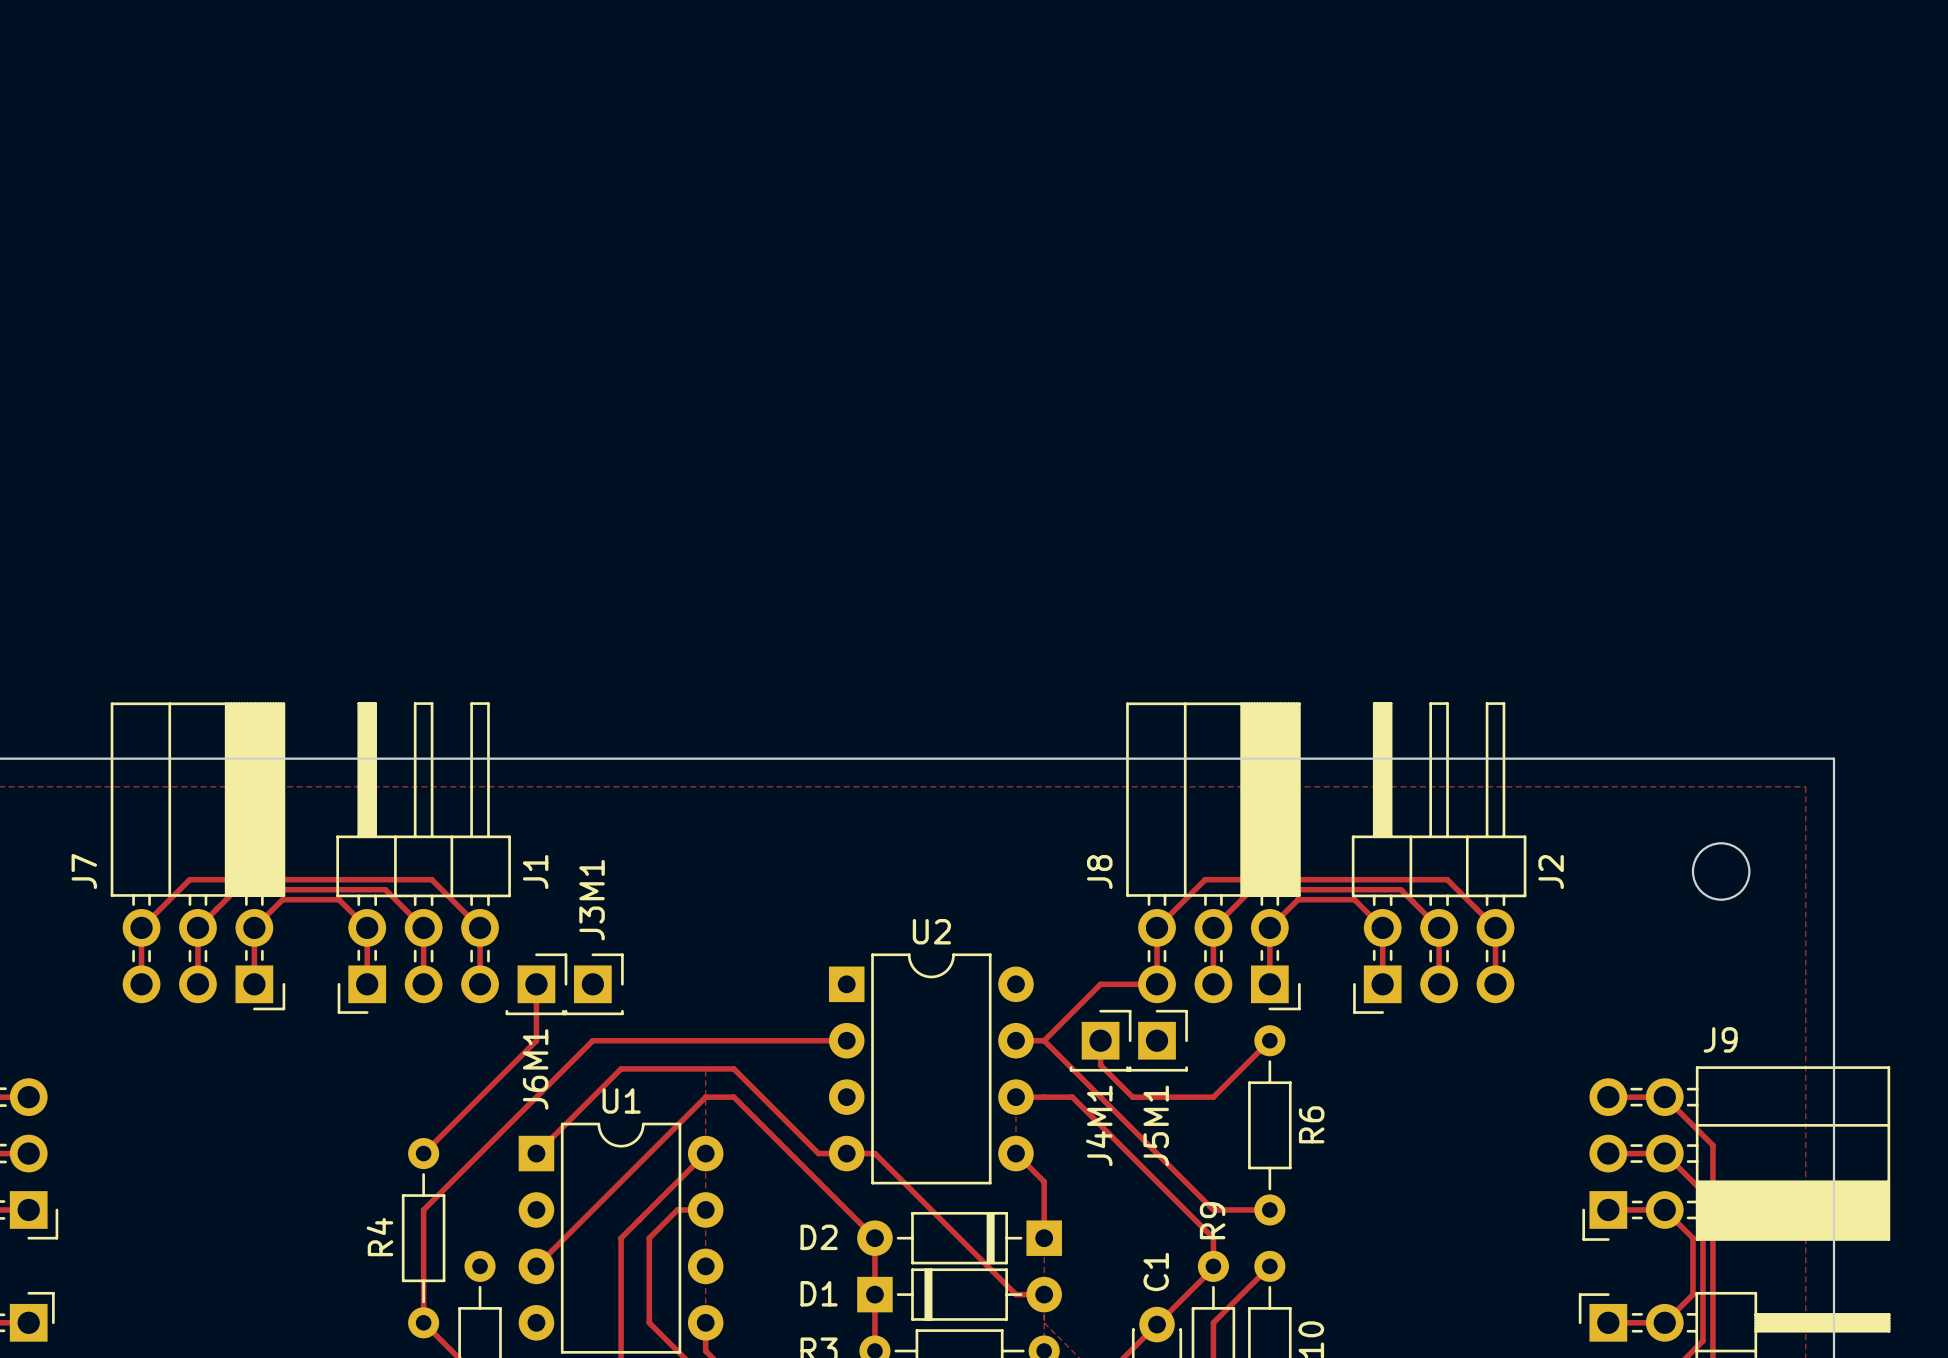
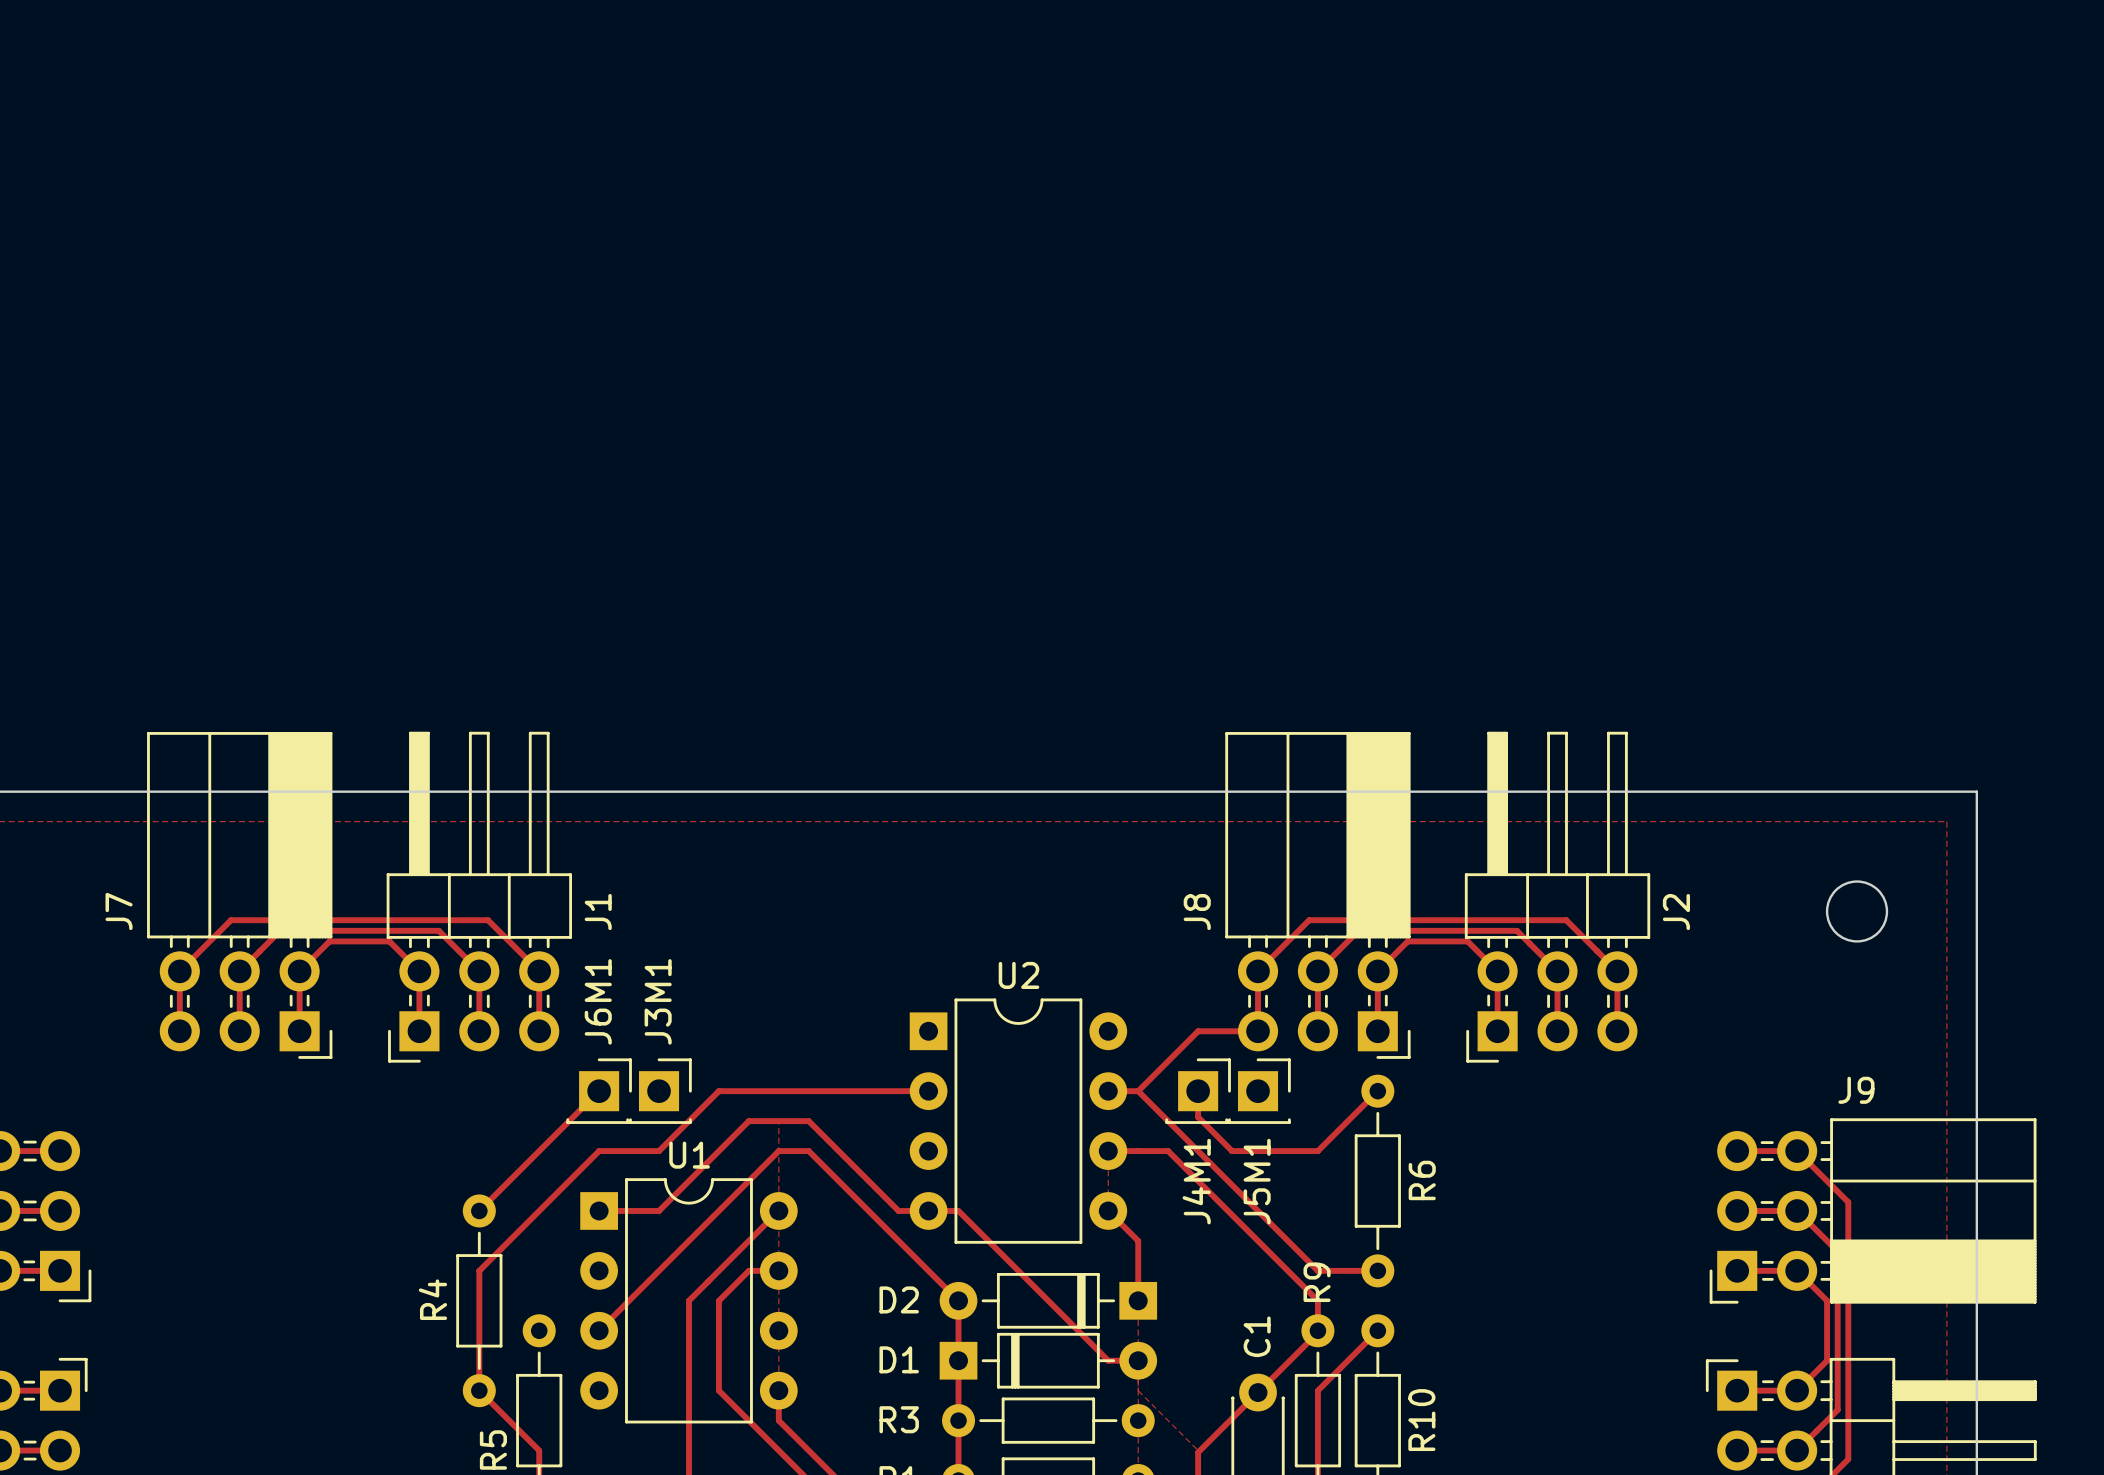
track: (536, 984) (536, 1040) -> none
J6M1 position: (536, 984) -> (599, 1091)
J3M1 position: (592, 984) -> (659, 1091)
track: (649, 1040) (592, 1040) (536, 1097) -> none
track: (621, 1068) (677, 1068) -> (688, 1121) (718, 1091)
track: none -> (748, 1121) (659, 1210) (599, 1210)
J6M1 name position: J6M1 (535, 1069) -> J6M1 (598, 1001)
track: (592, 1097) (536, 1153) -> (659, 1151) (599, 1151)

